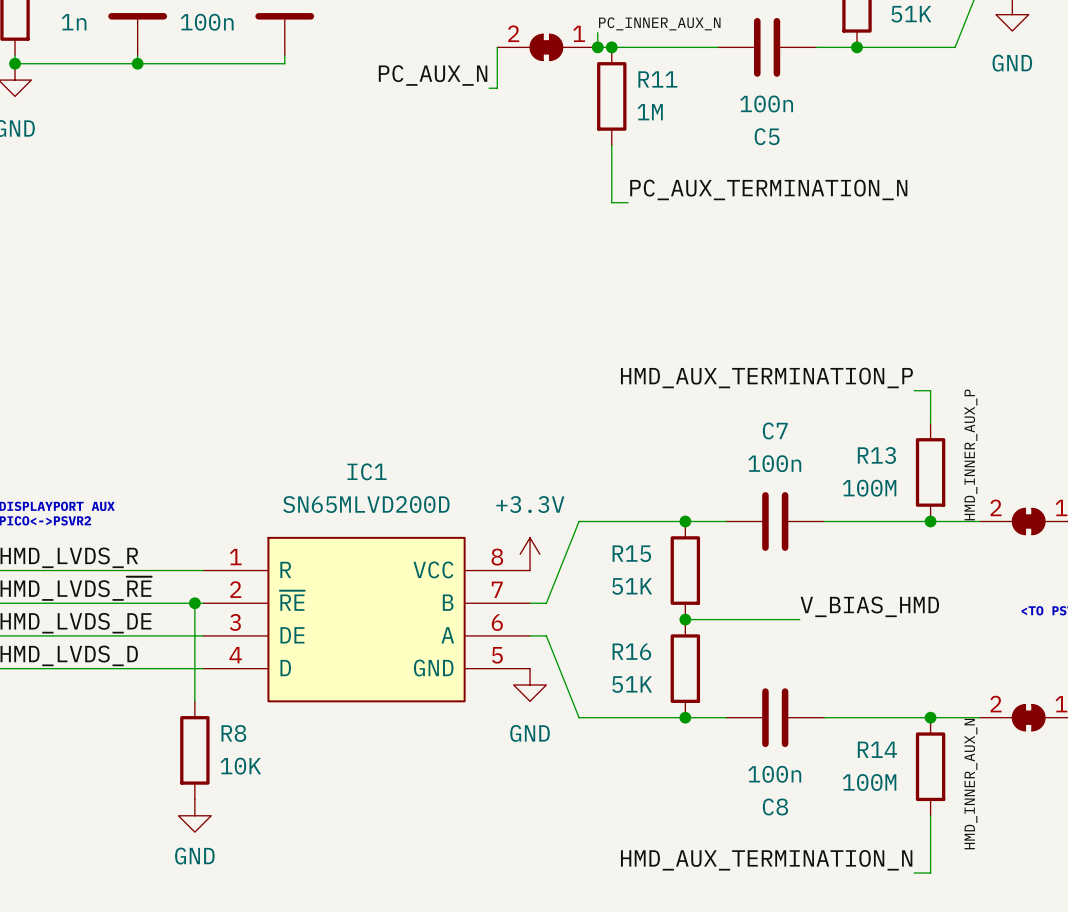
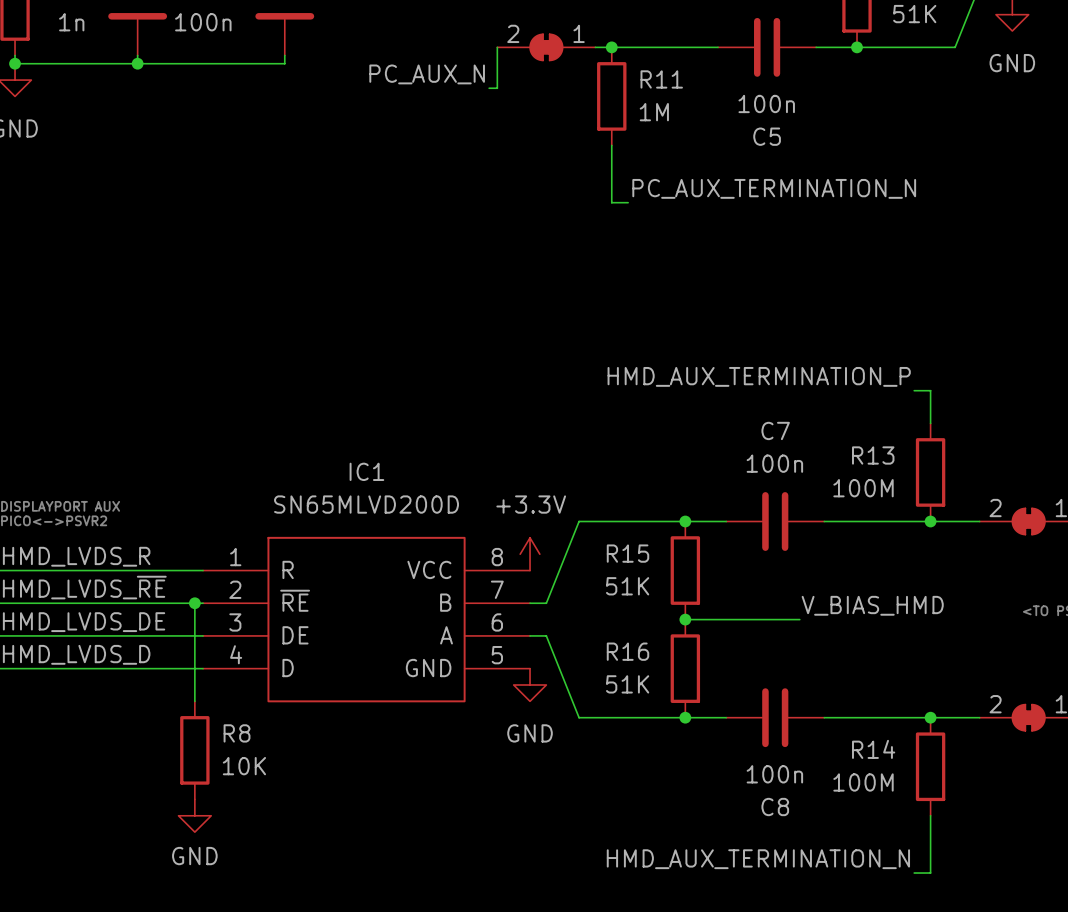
label: PC_INNER_AUX_N (659, 23) -> none
wire: (597, 32) (597, 47) -> none
junction: (597, 47) -> none
label: HMD_INNER_AUX_P (970, 454) -> none
label: HMD_INNER_AUX_N (970, 784) -> none

